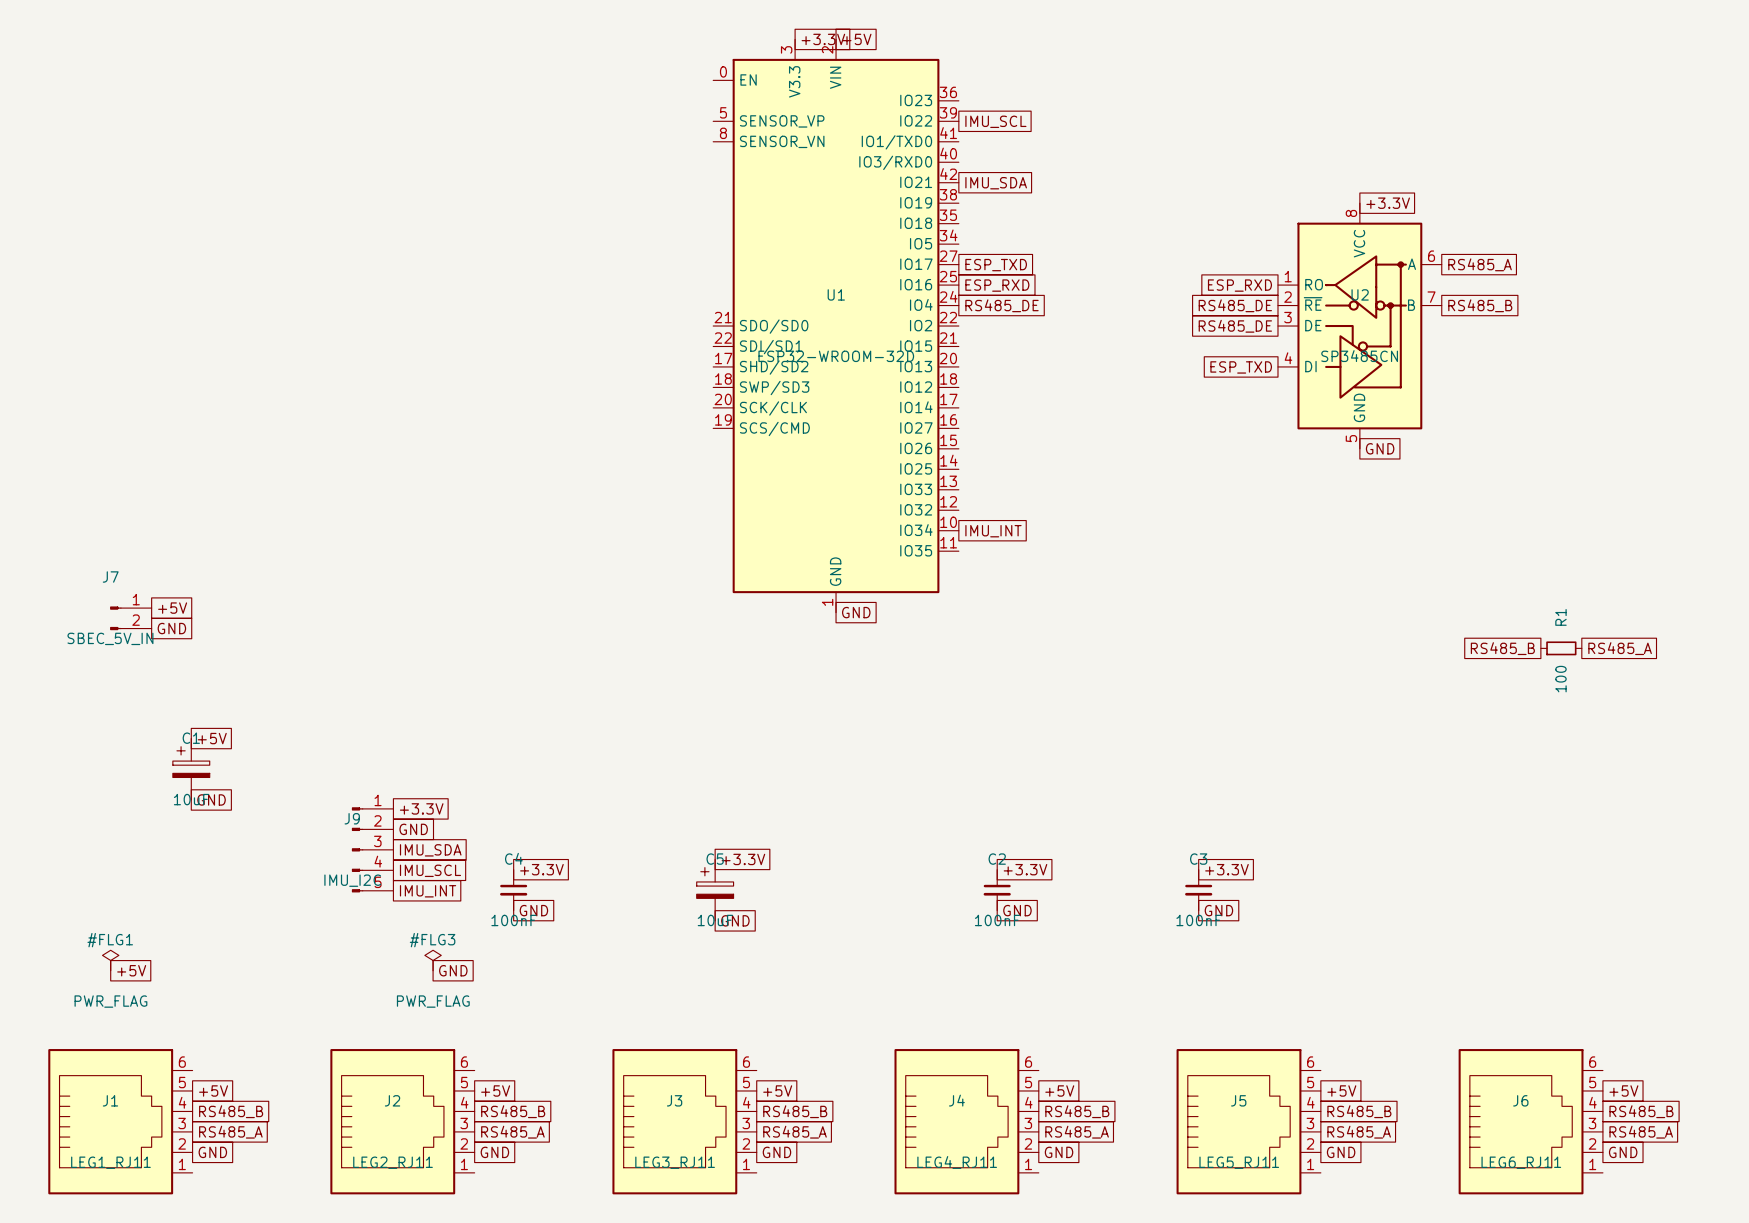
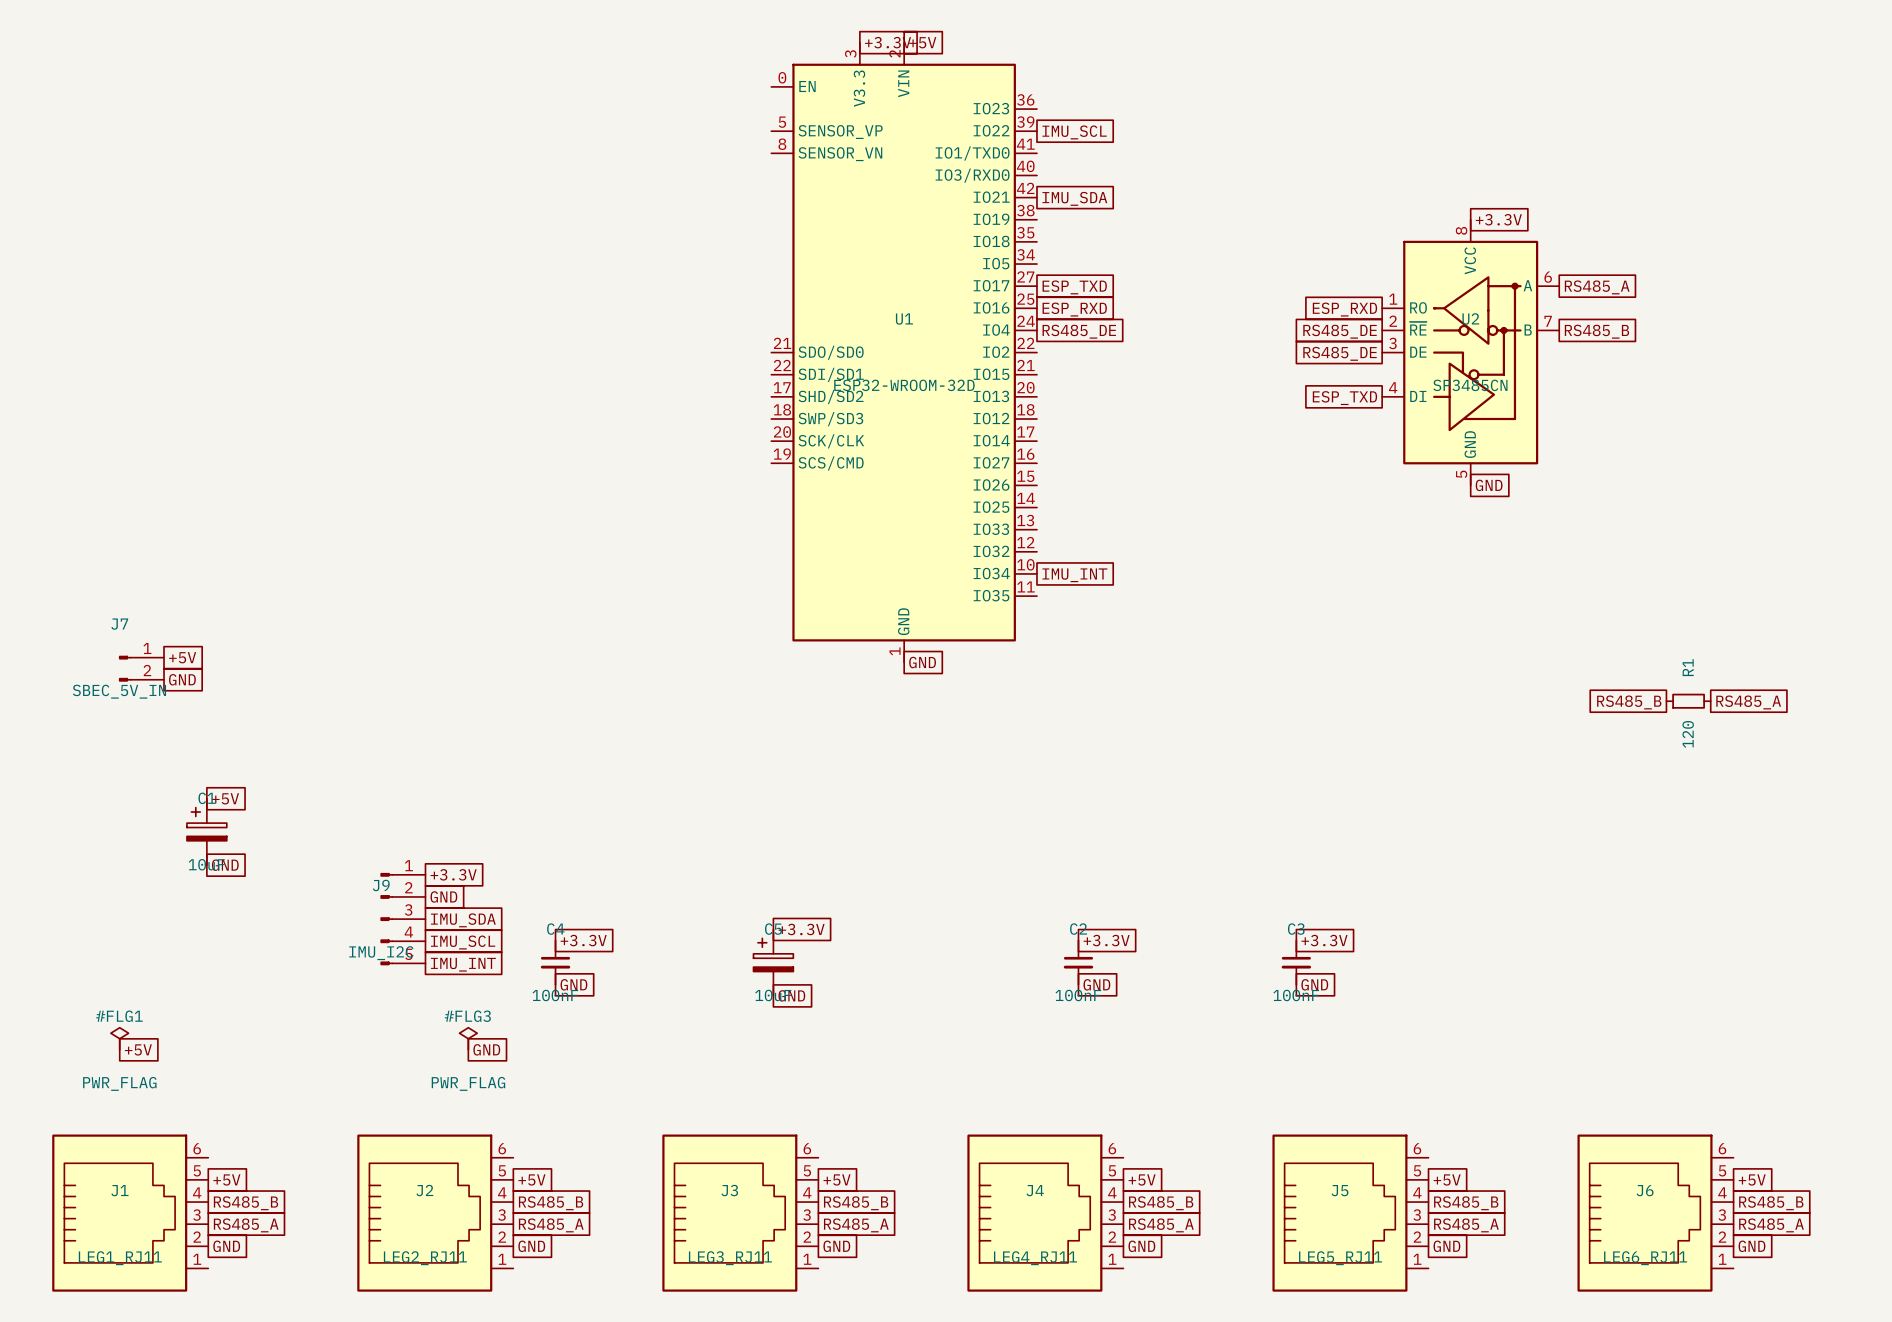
R1 value: 100 (1560, 679) -> 120 (1688, 734)

